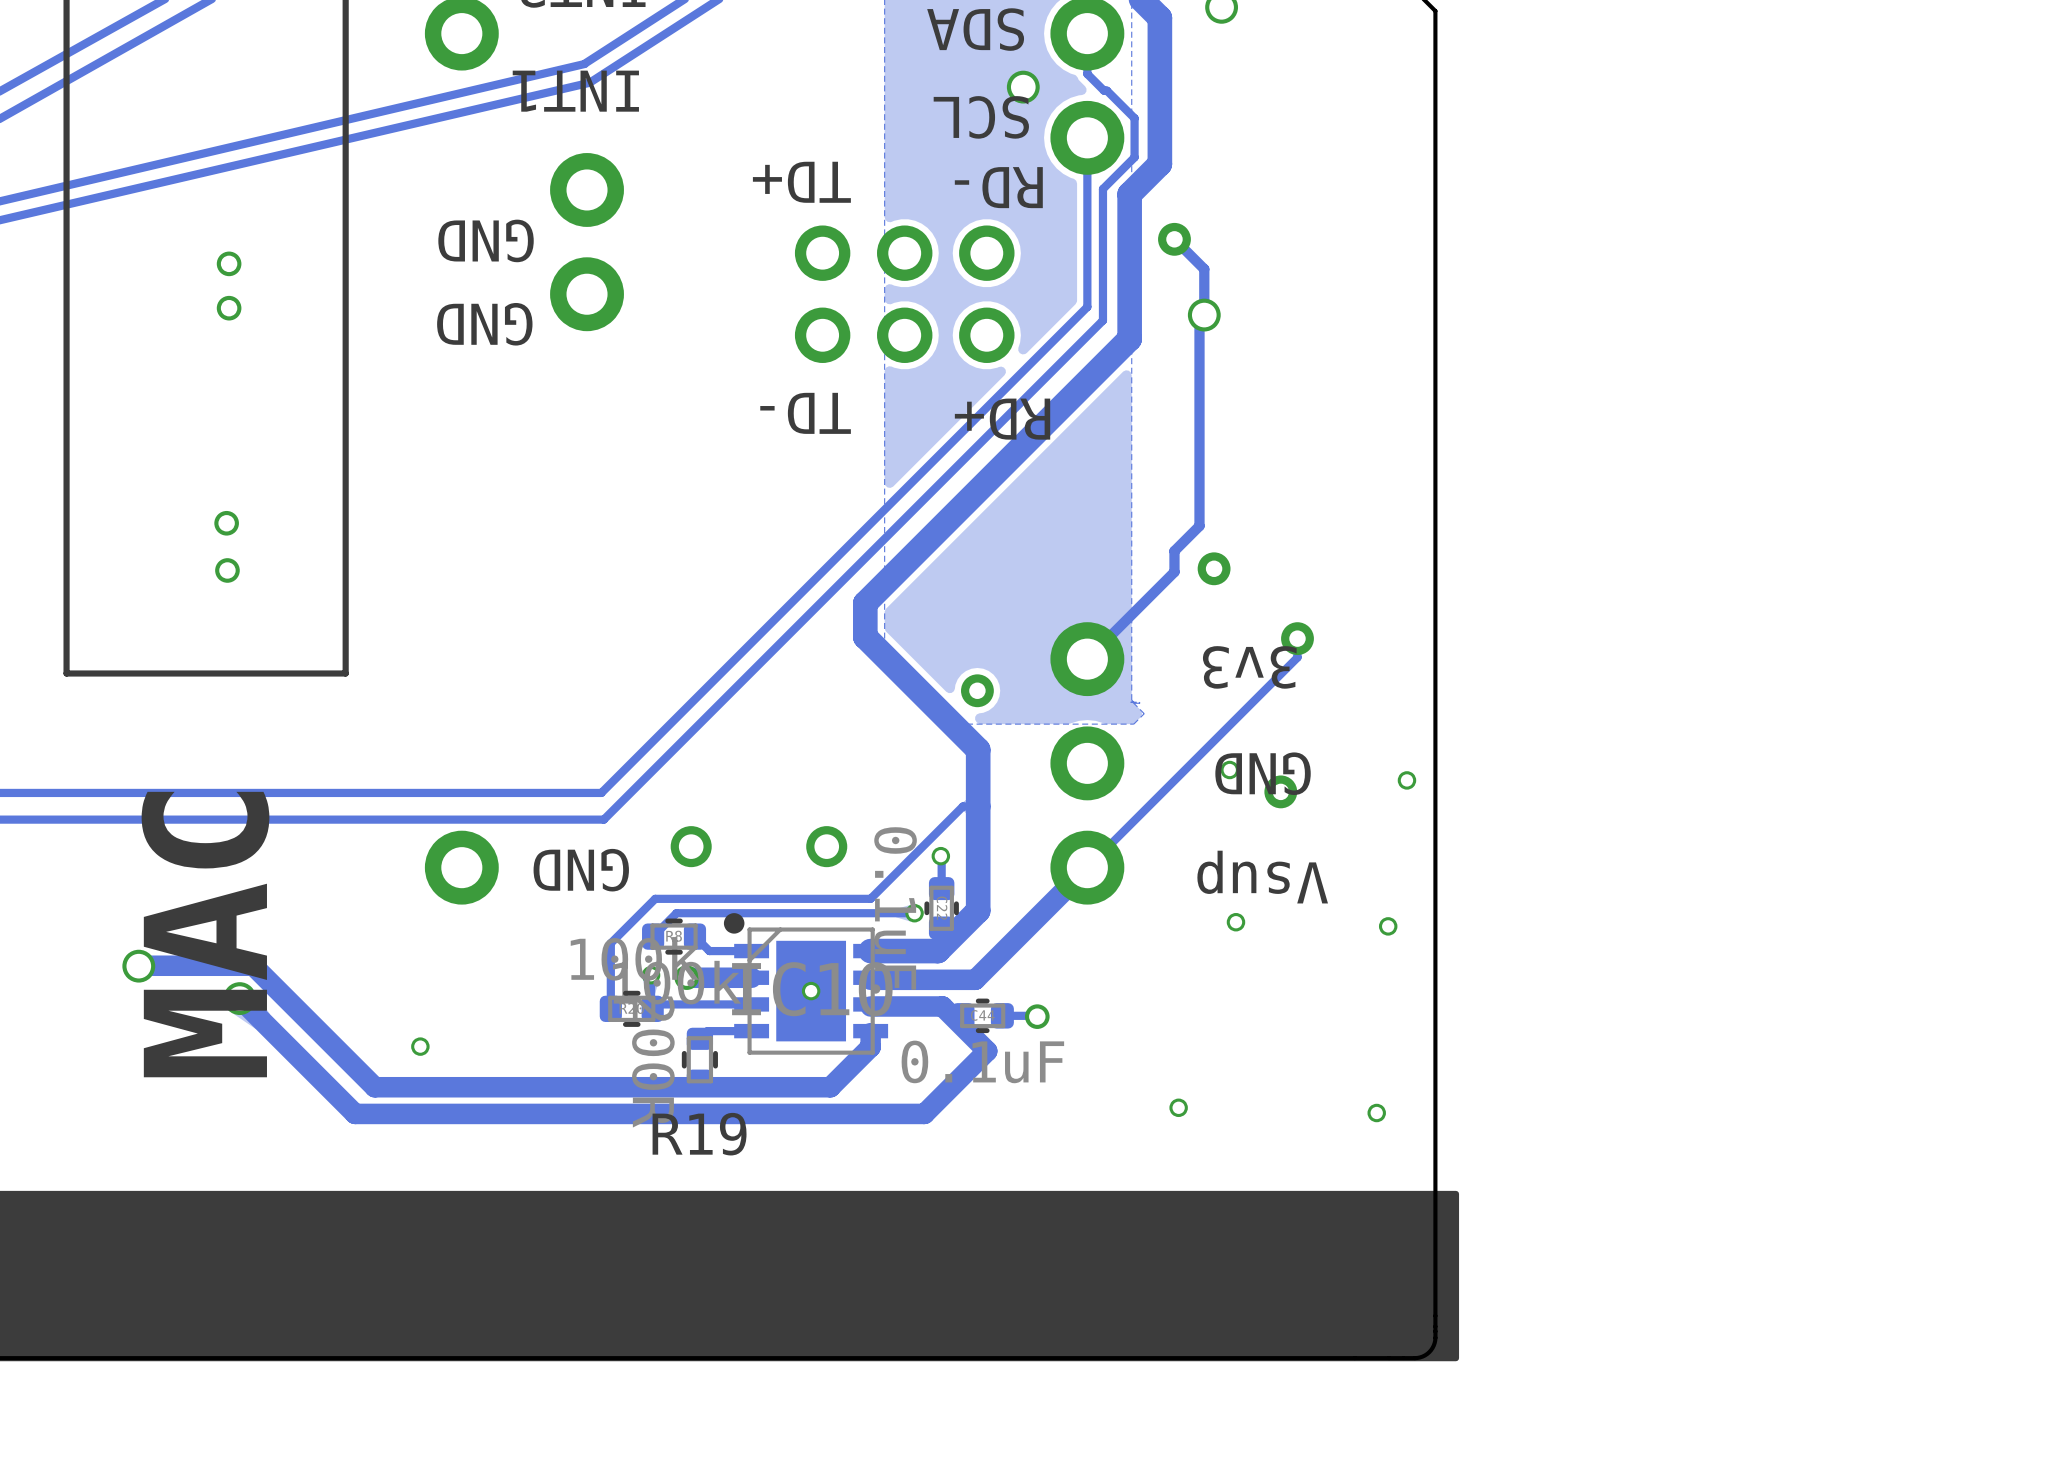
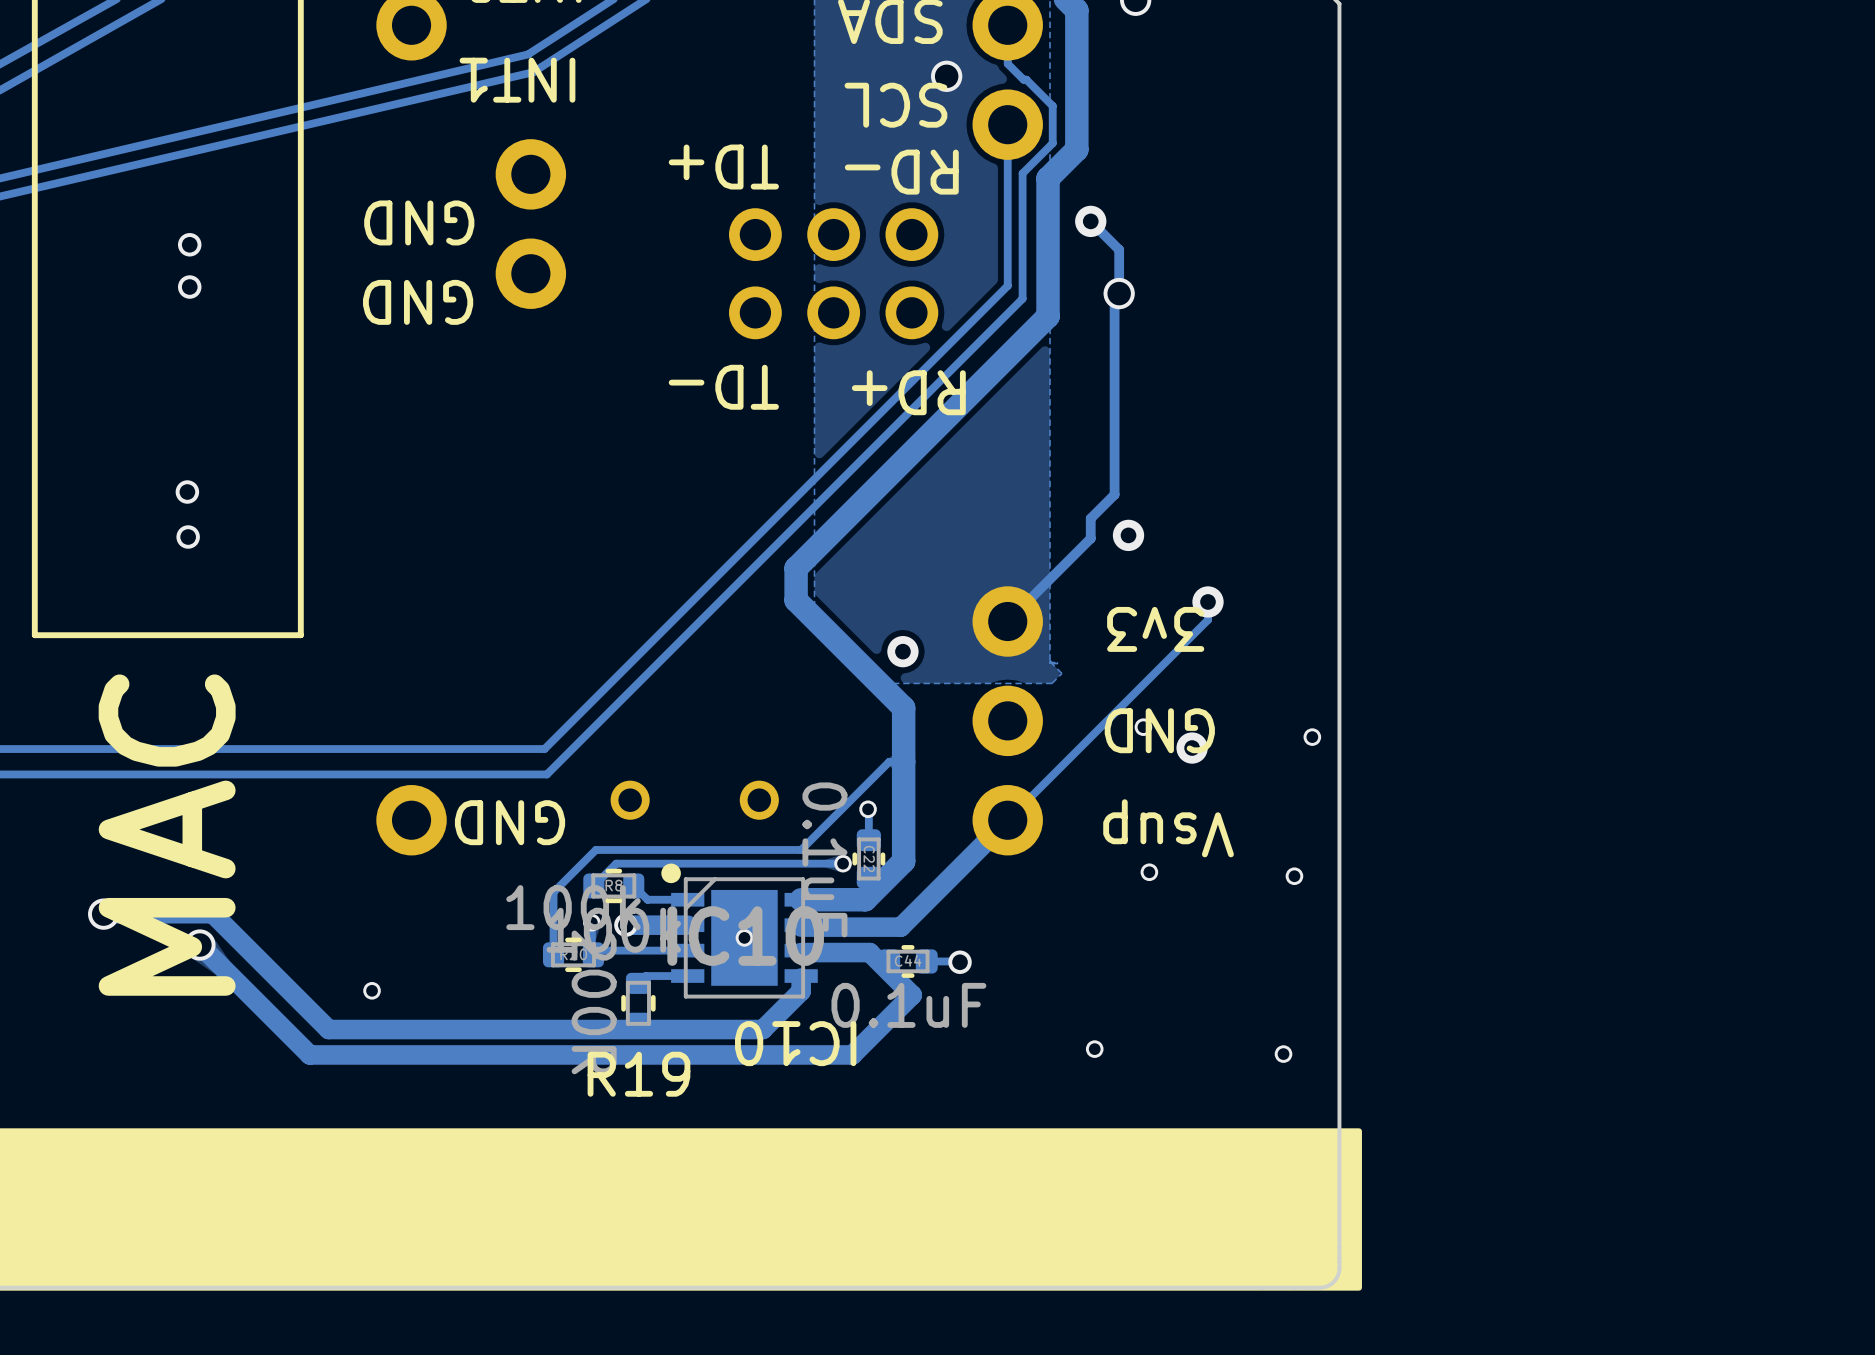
text: none -> IC10 (795, 1043)

